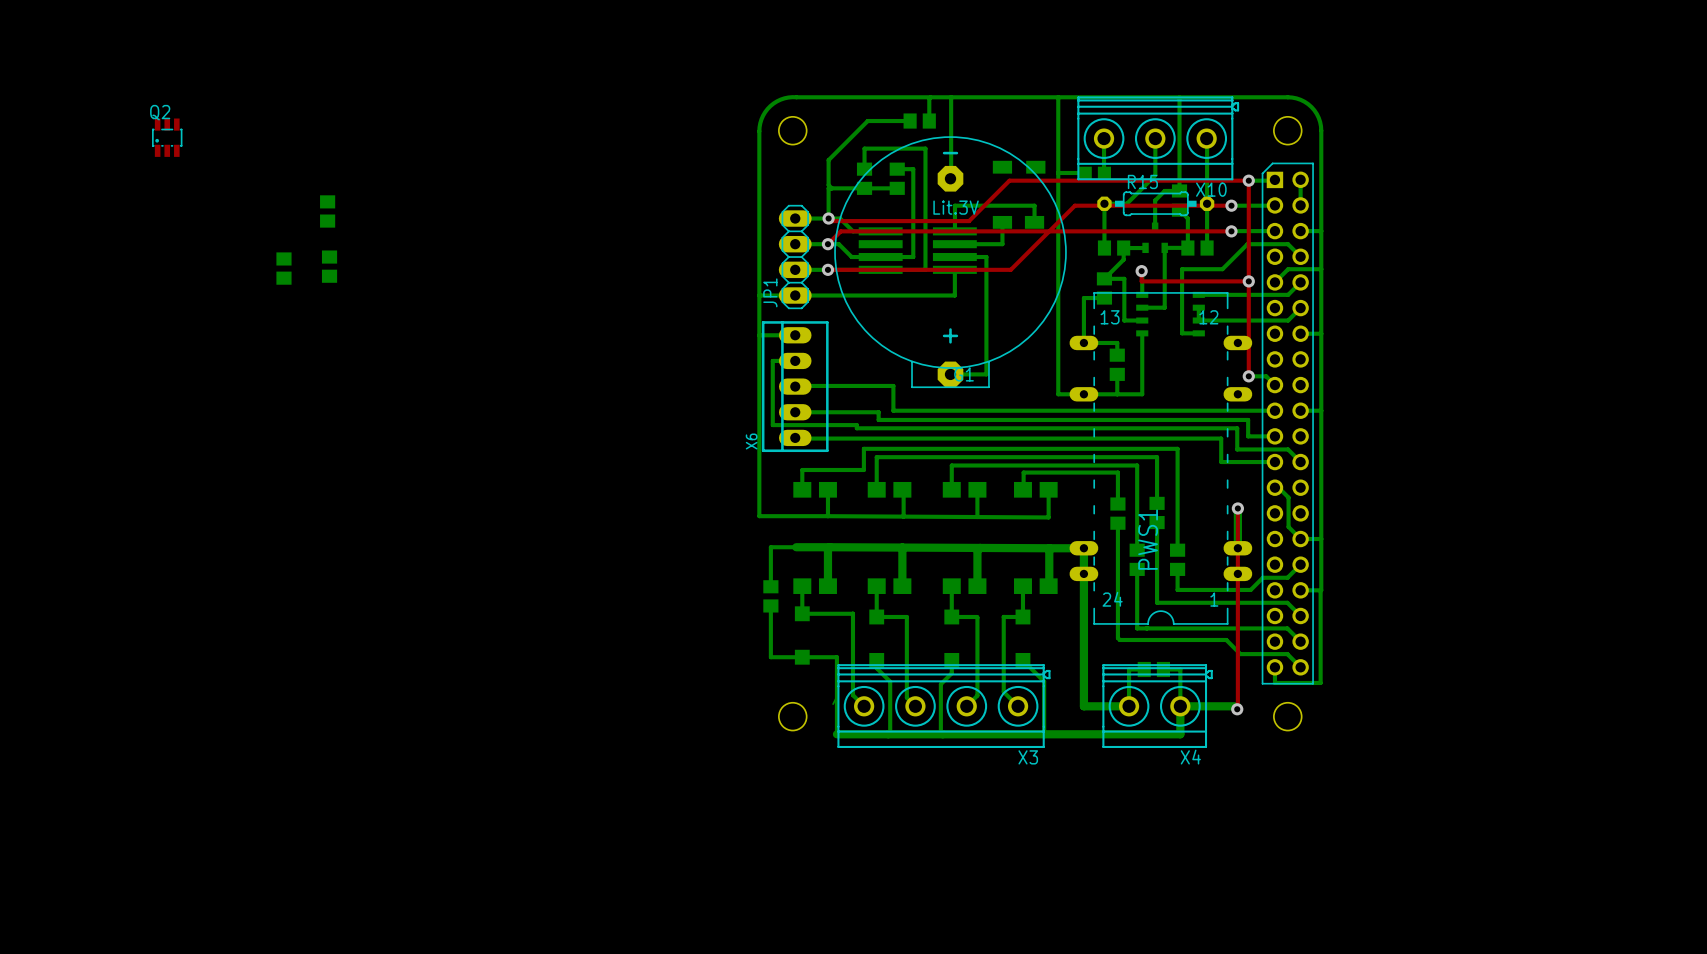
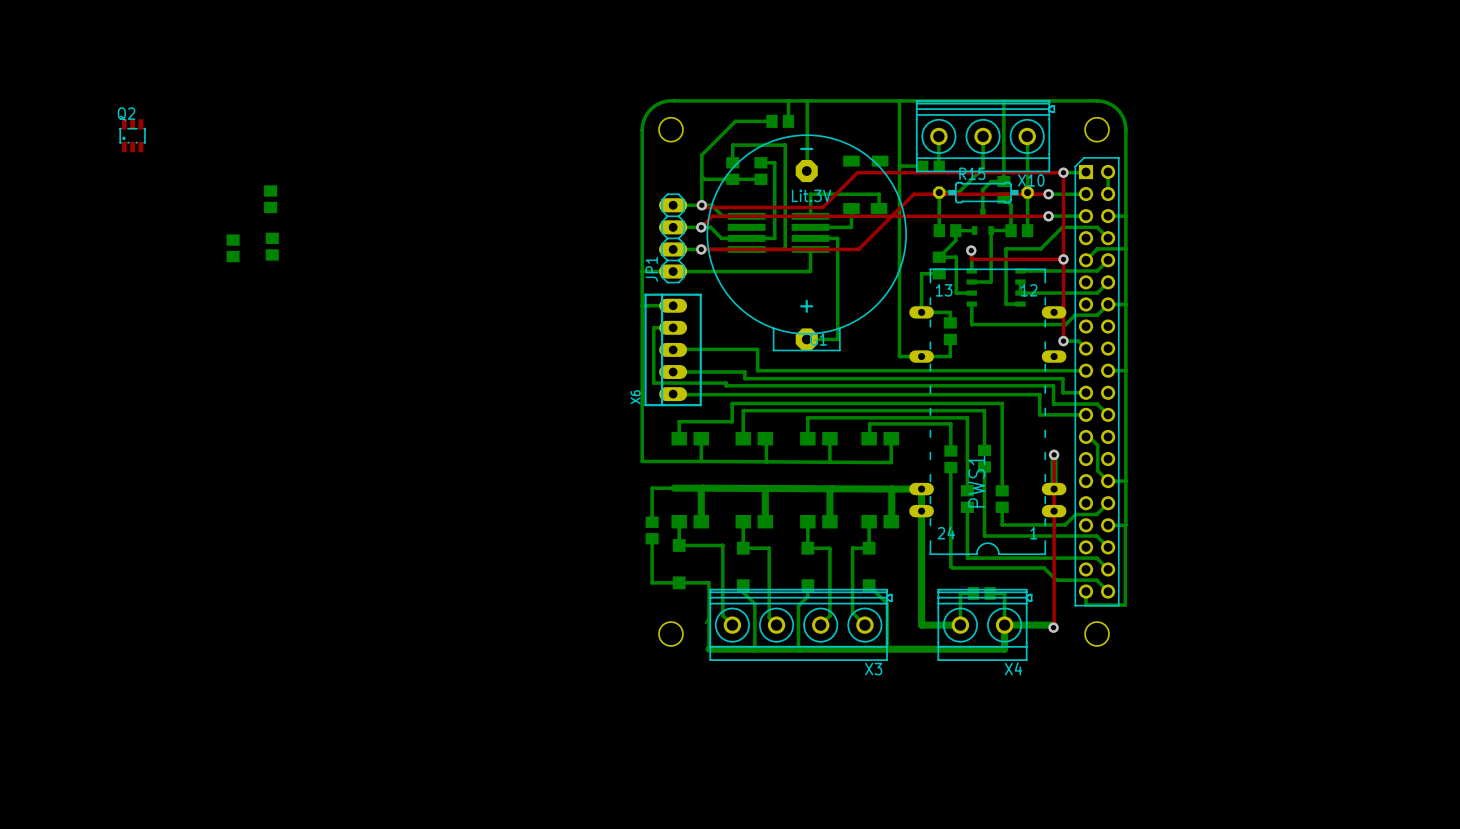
bottom track: (1142, 357) (1142, 394) (1117, 394) -> (971, 324) (1065, 324) (1075, 315) (1097, 315) (1108, 304)

